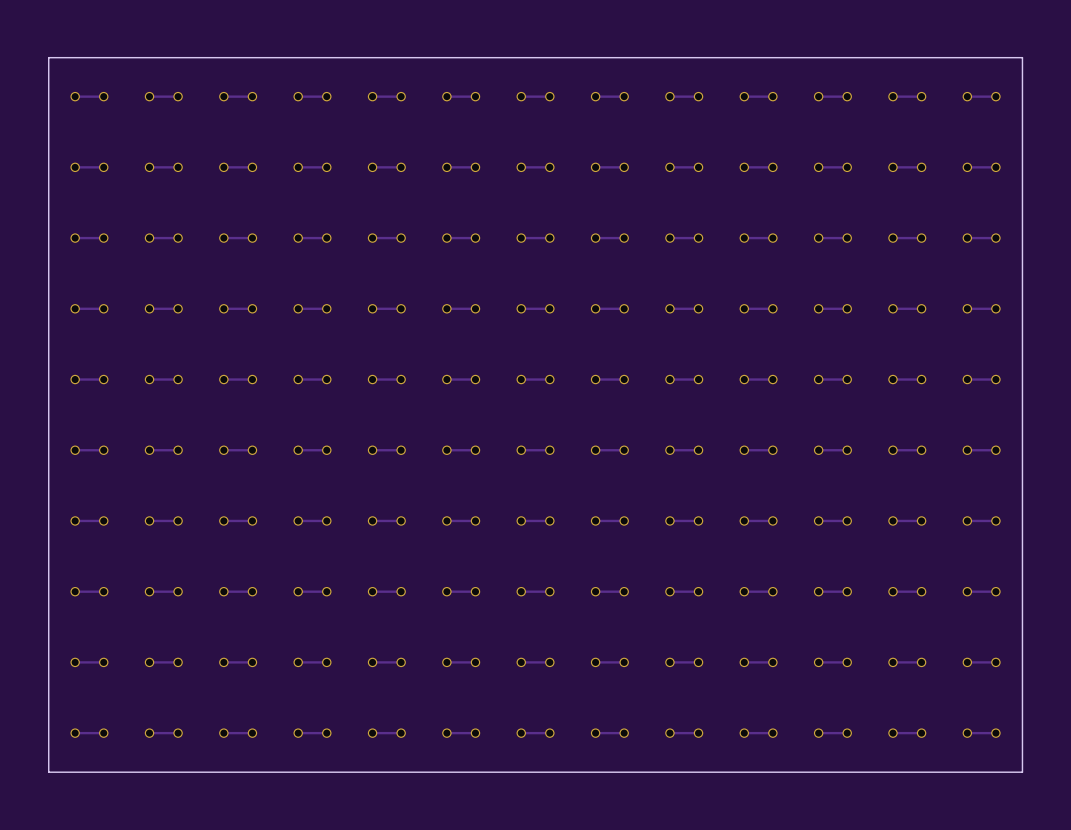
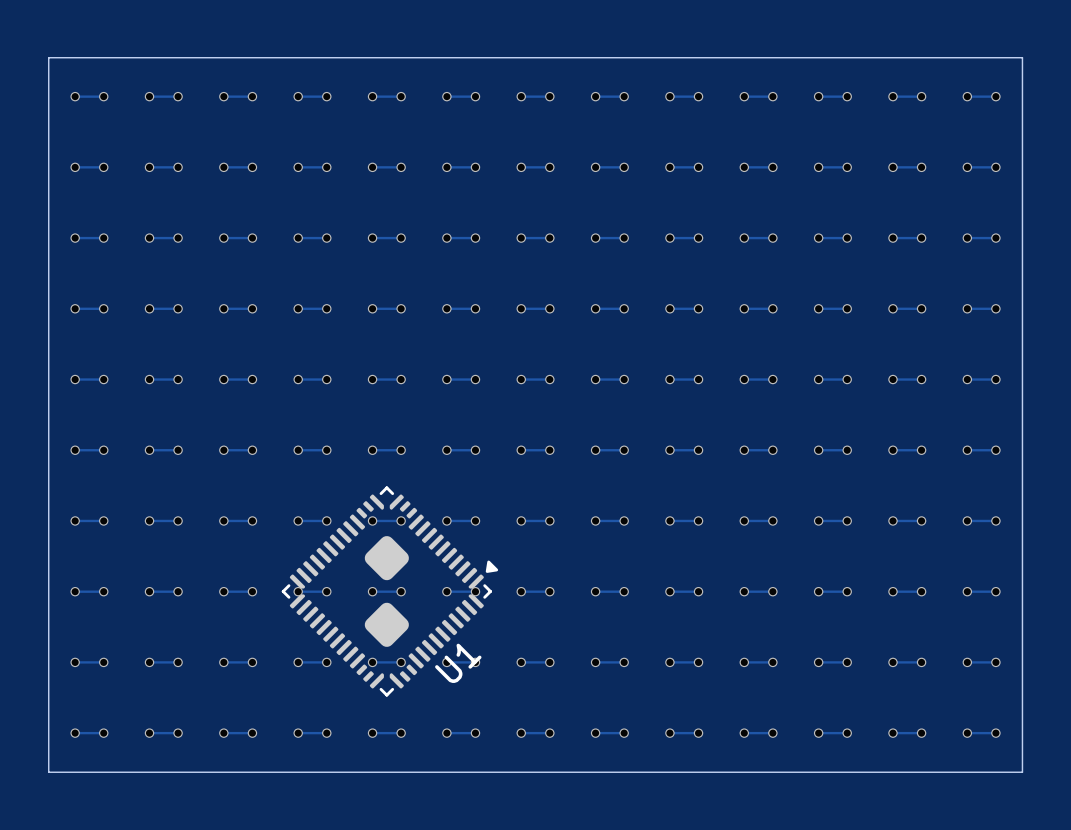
U1: none -> (389, 591)

